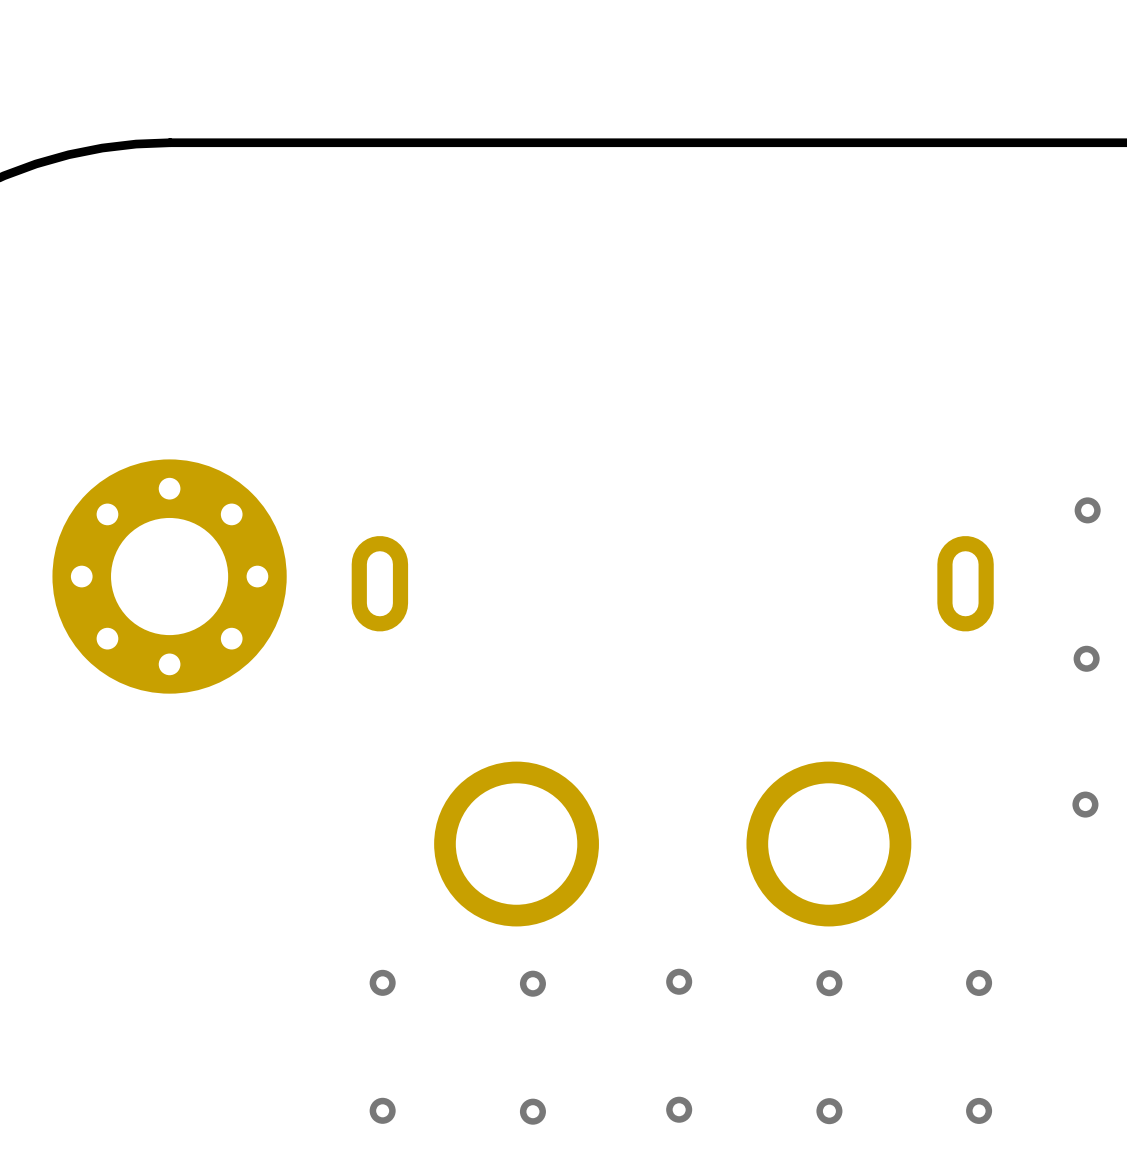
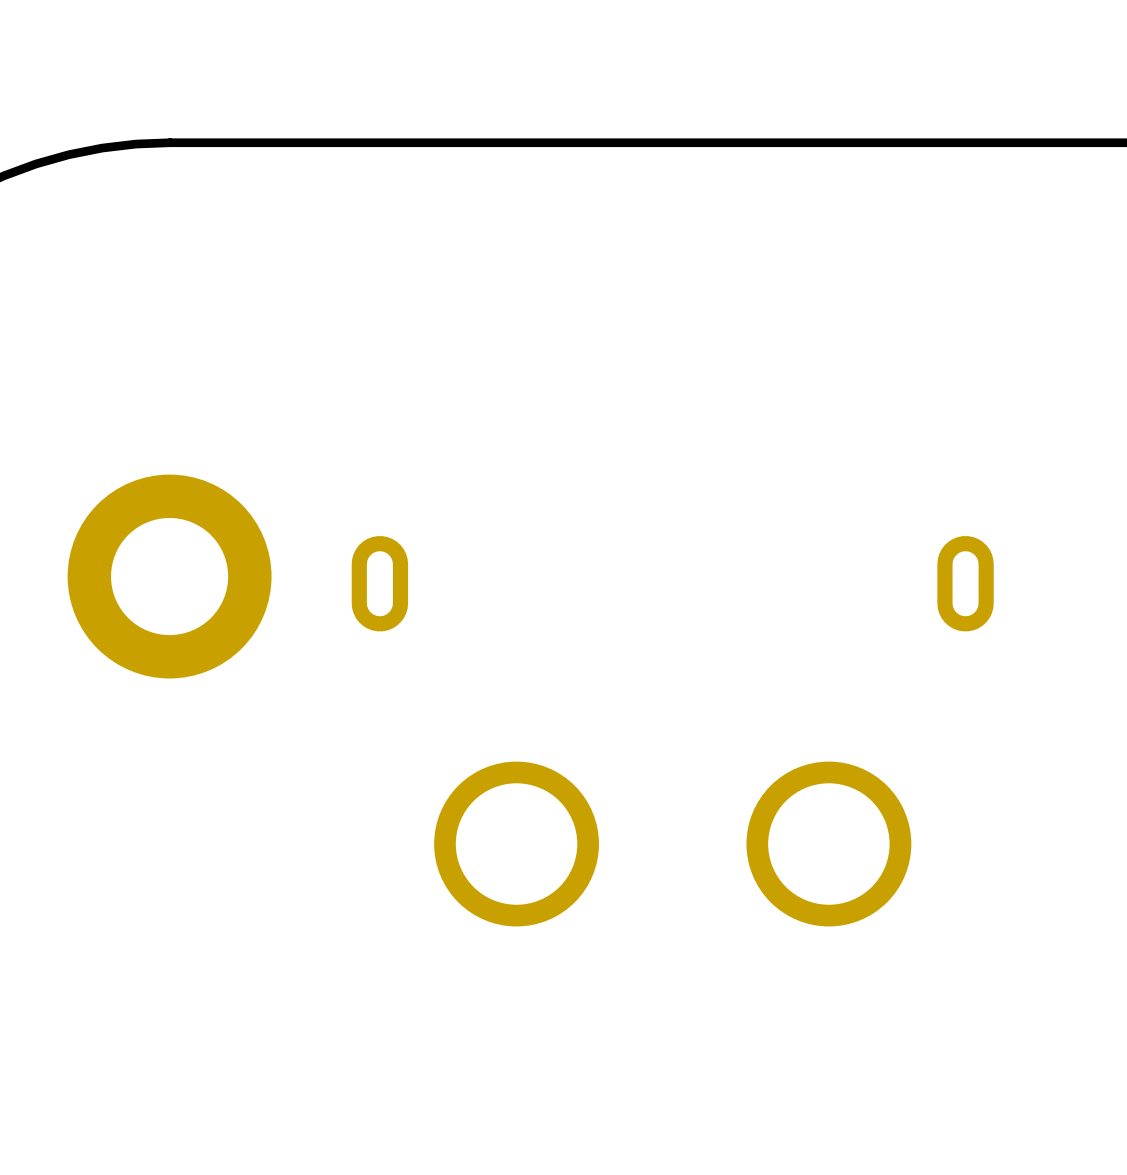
part footprint: [52, 459, 287, 694] -> [67, 474, 272, 679]
via: (1087, 510) -> none
via: (1086, 658) -> none
via: (1085, 804) -> none
via: (679, 981) -> none
via: (382, 982) -> none
via: (979, 982) -> none
via: (532, 983) -> none
via: (829, 983) -> none
via: (679, 1109) -> none
via: (382, 1110) -> none
via: (979, 1110) -> none
via: (532, 1111) -> none
via: (829, 1111) -> none

